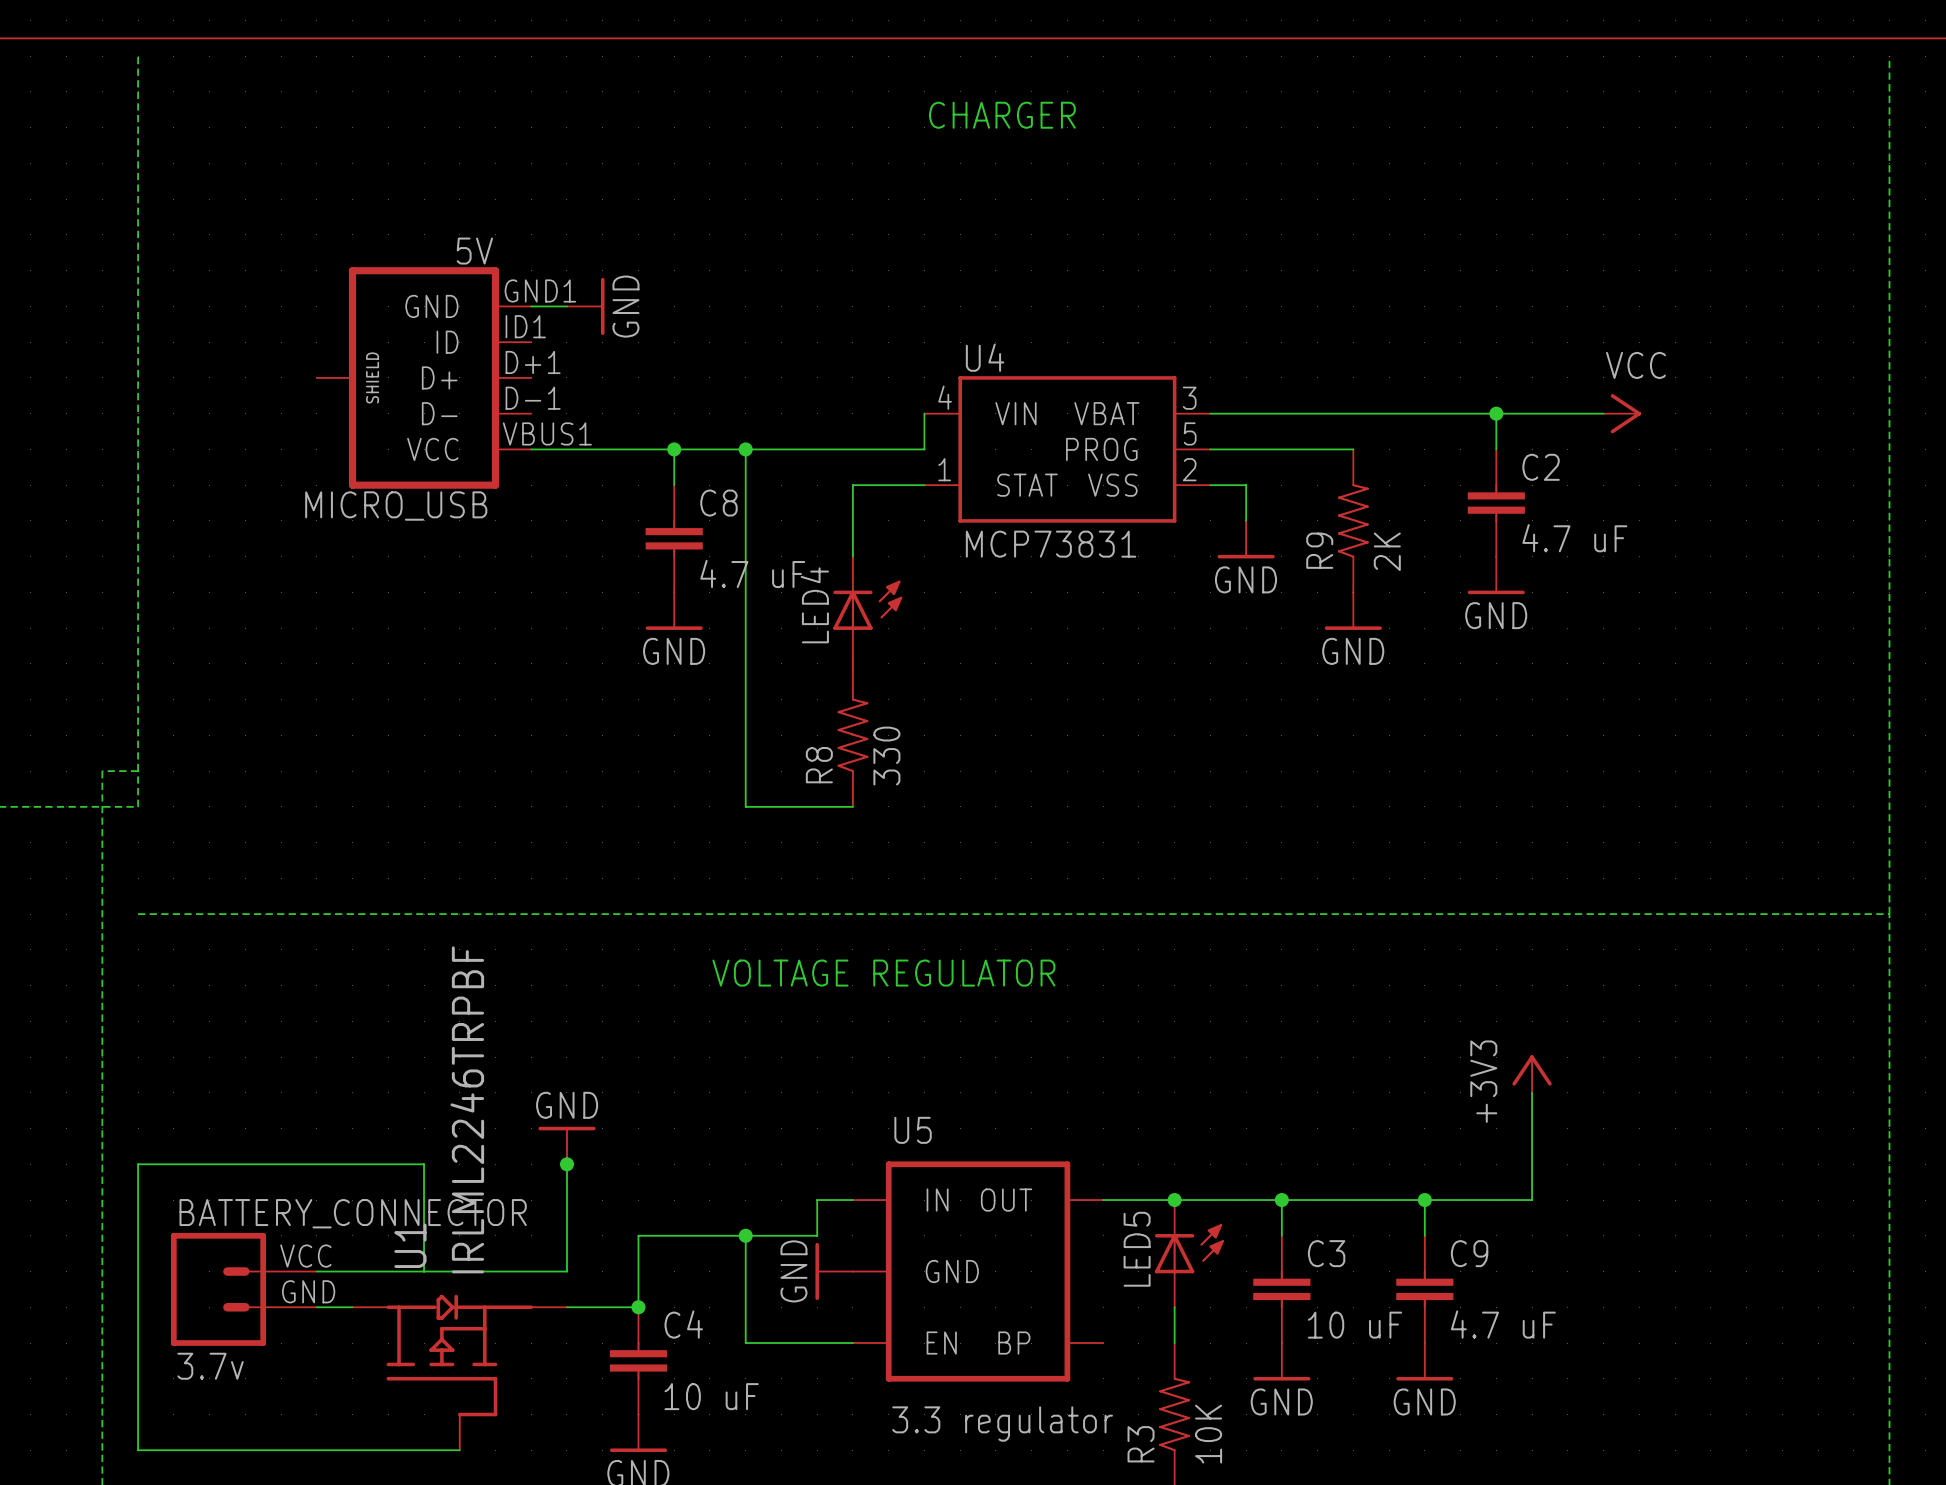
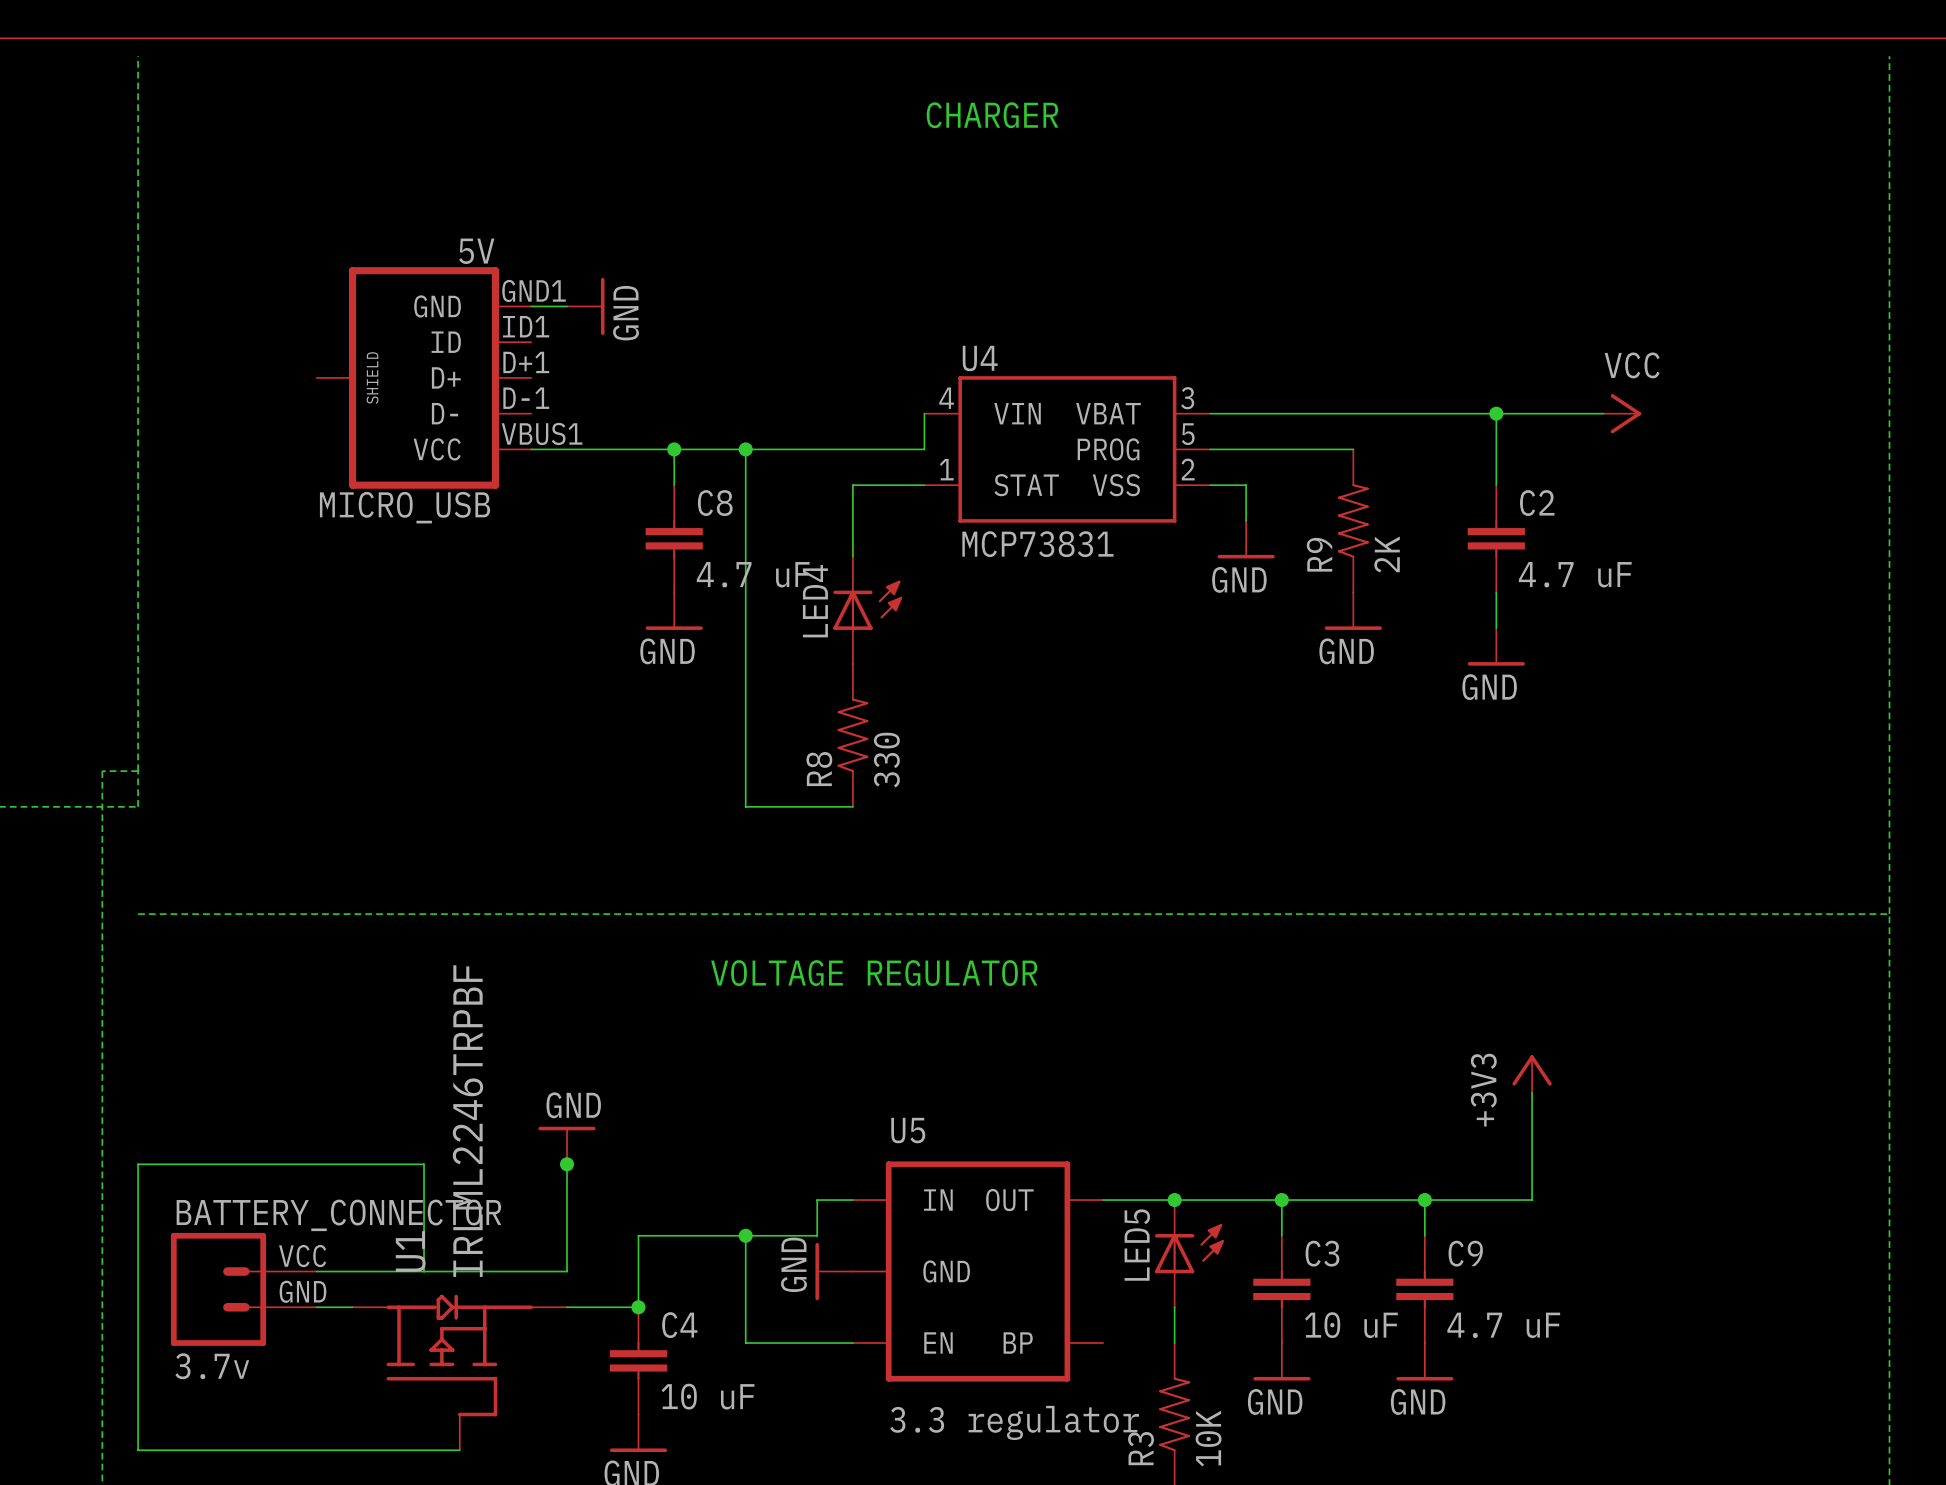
C2 position: (1496, 503) -> (1496, 538)
power symbol position: GND (1496, 575) -> GND (1496, 646)
wire: none -> (1496, 592) (1496, 628)

